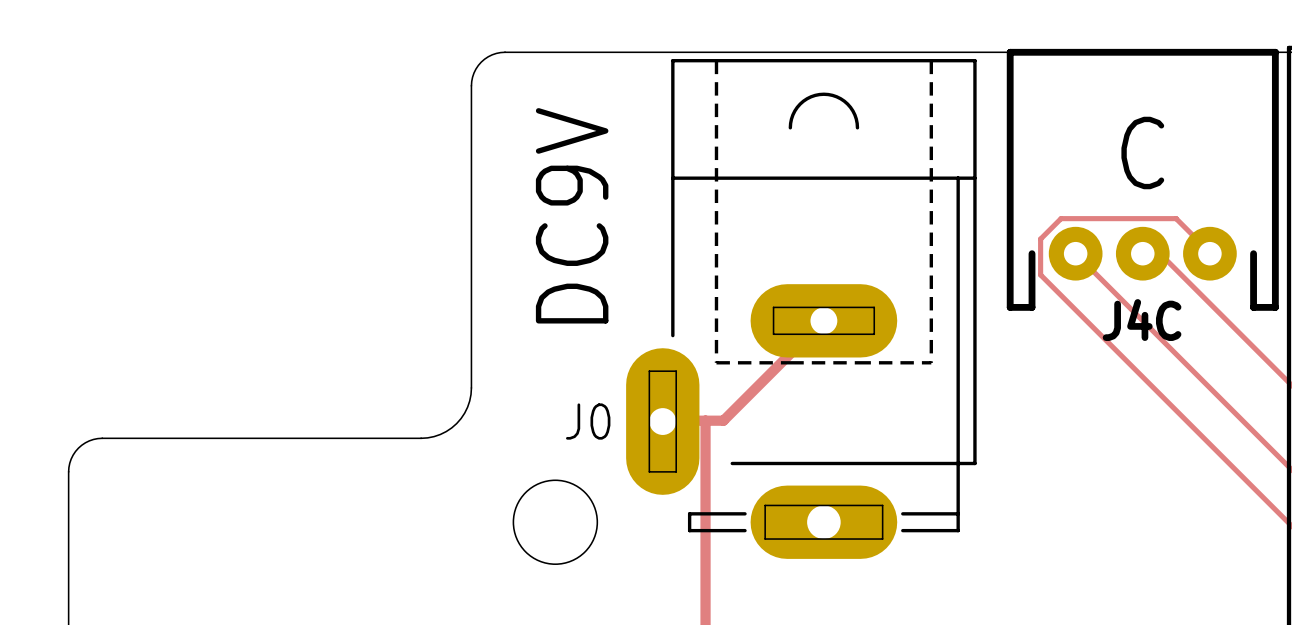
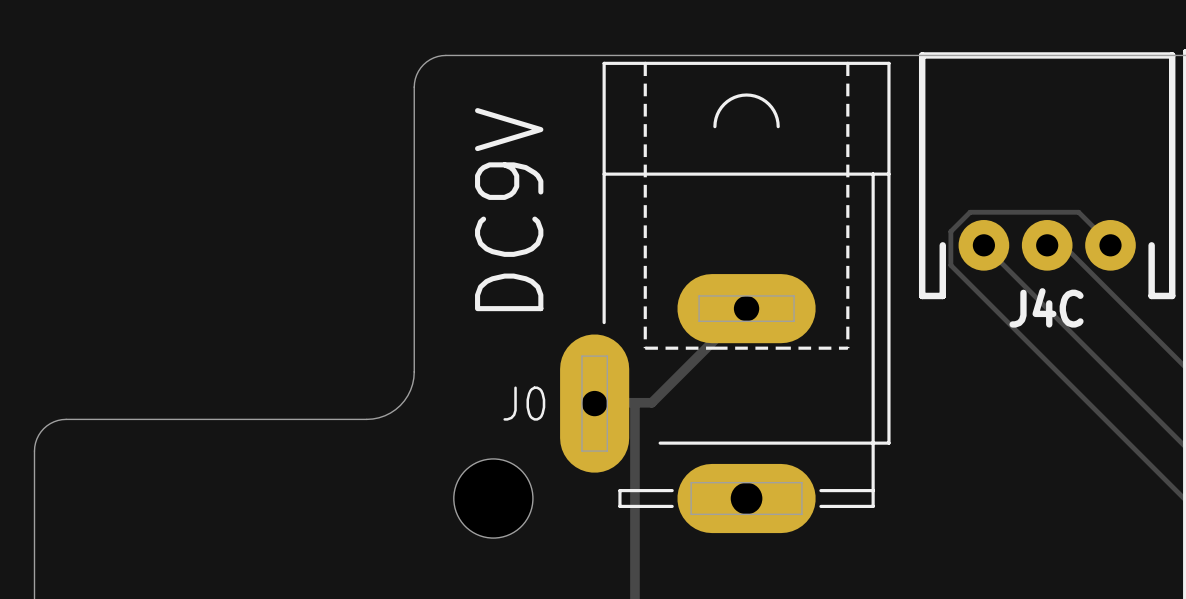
text: C (1142, 152) -> none

